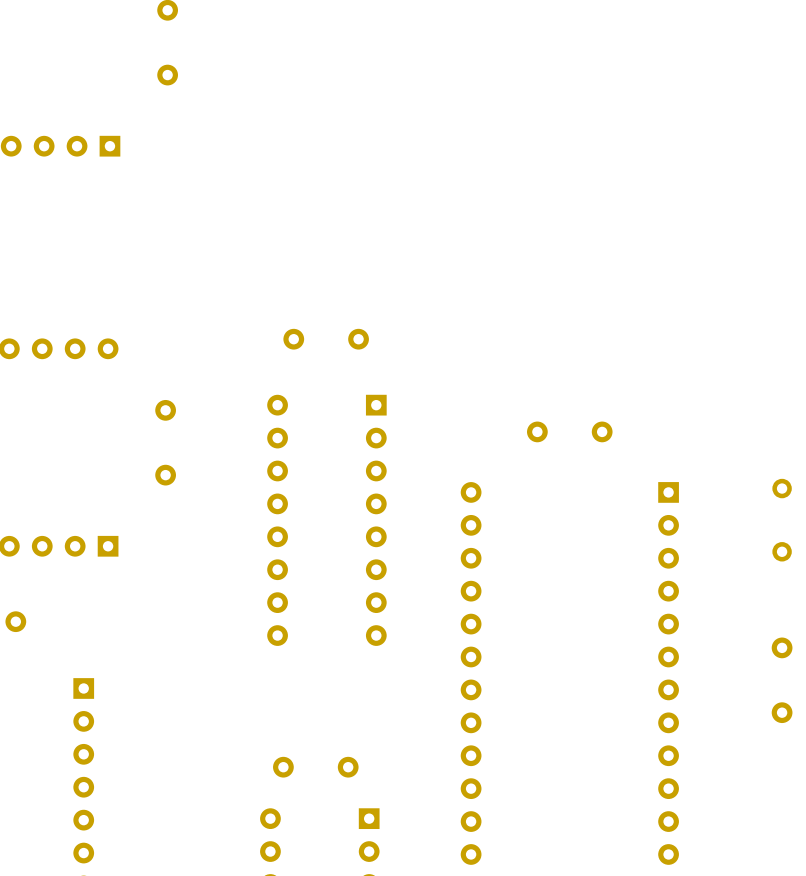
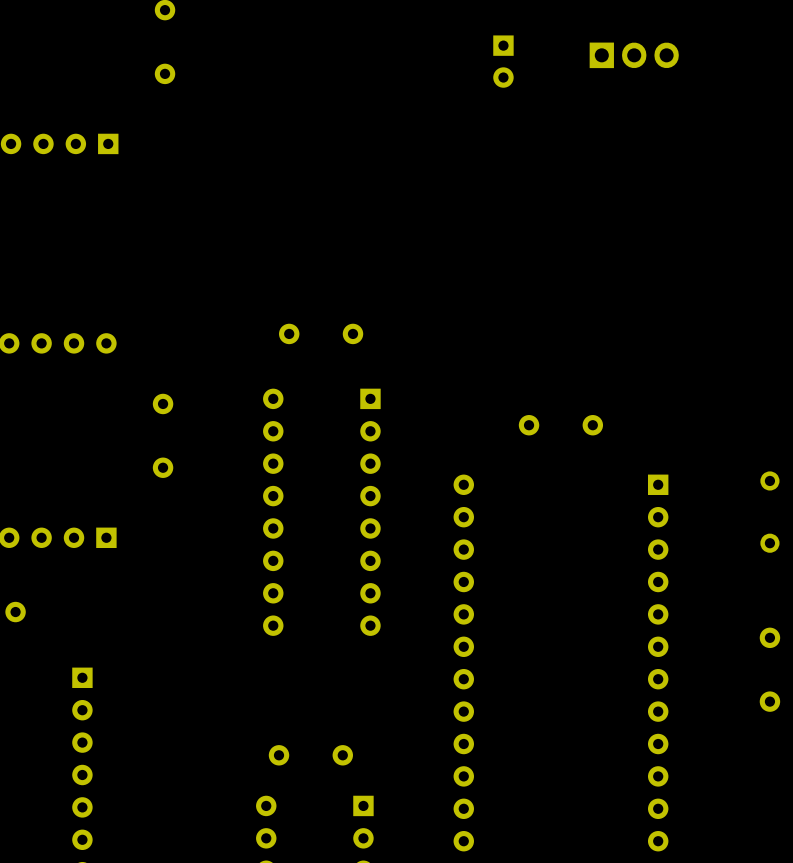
part: none -> (634, 55)
part: none -> (503, 61)

